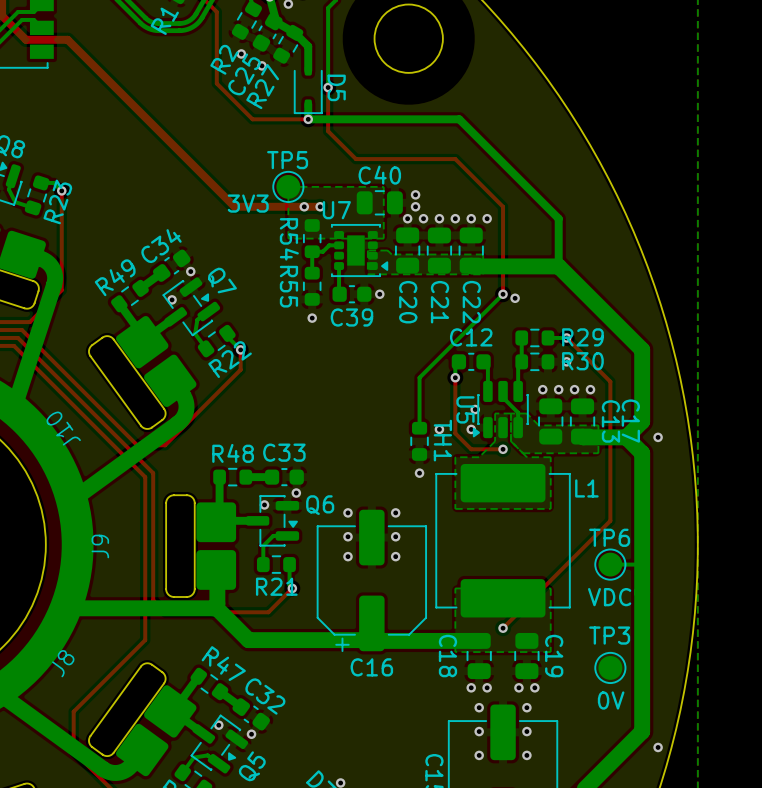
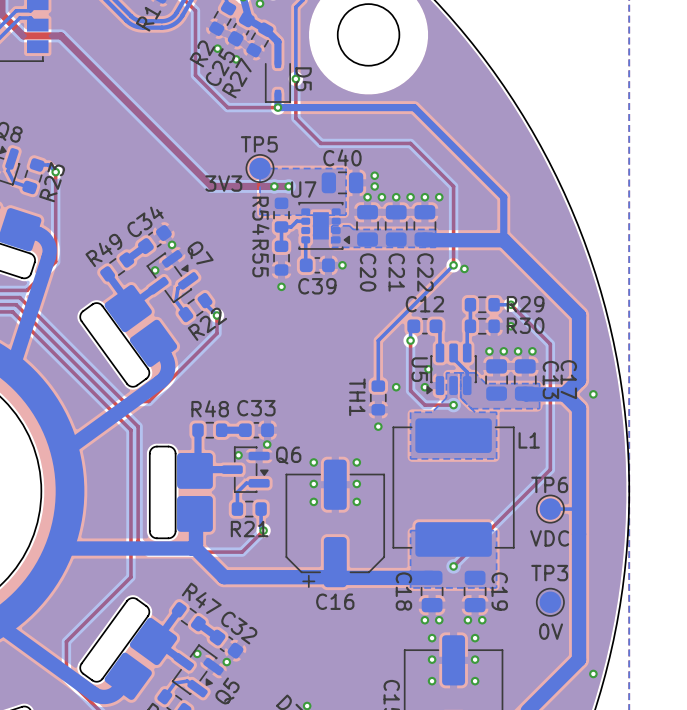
J10 name: J10 (63, 428) -> none
TH1 name position: TH1 (442, 440) -> TH1 (357, 397)
J9 name: J9 (100, 546) -> none
J8 name: J8 (63, 663) -> none

